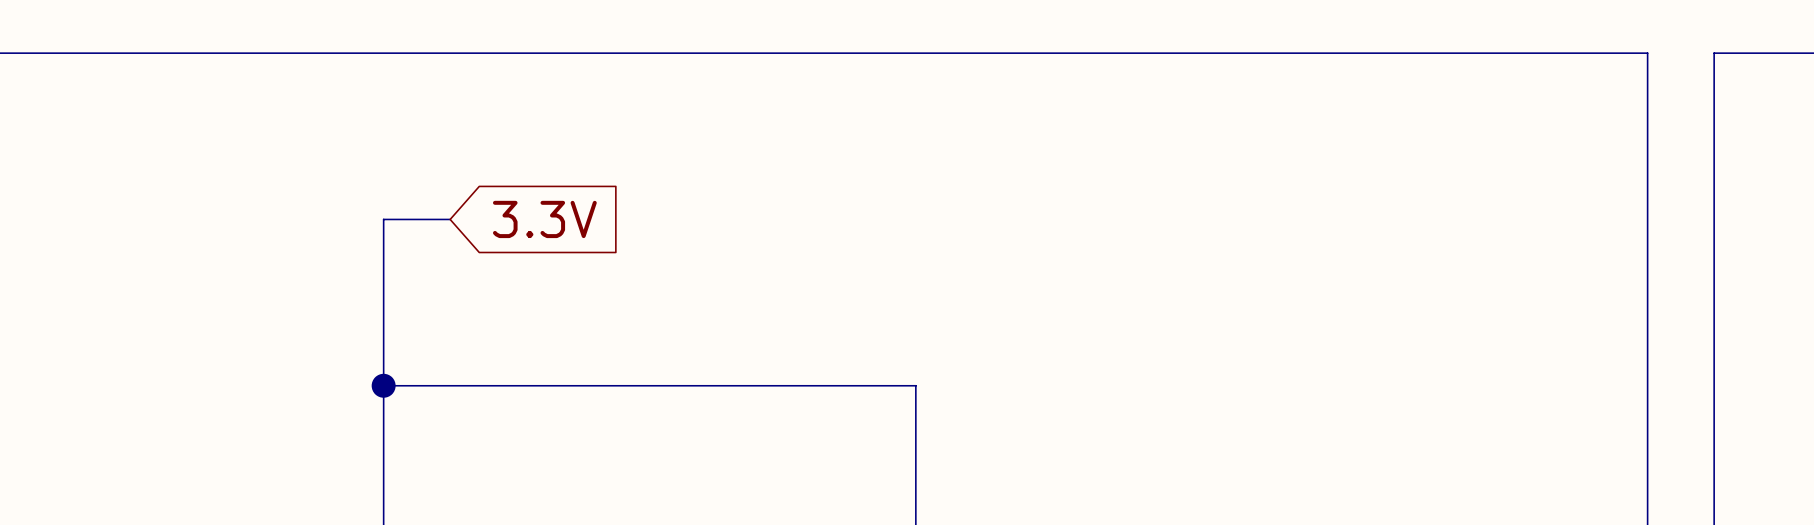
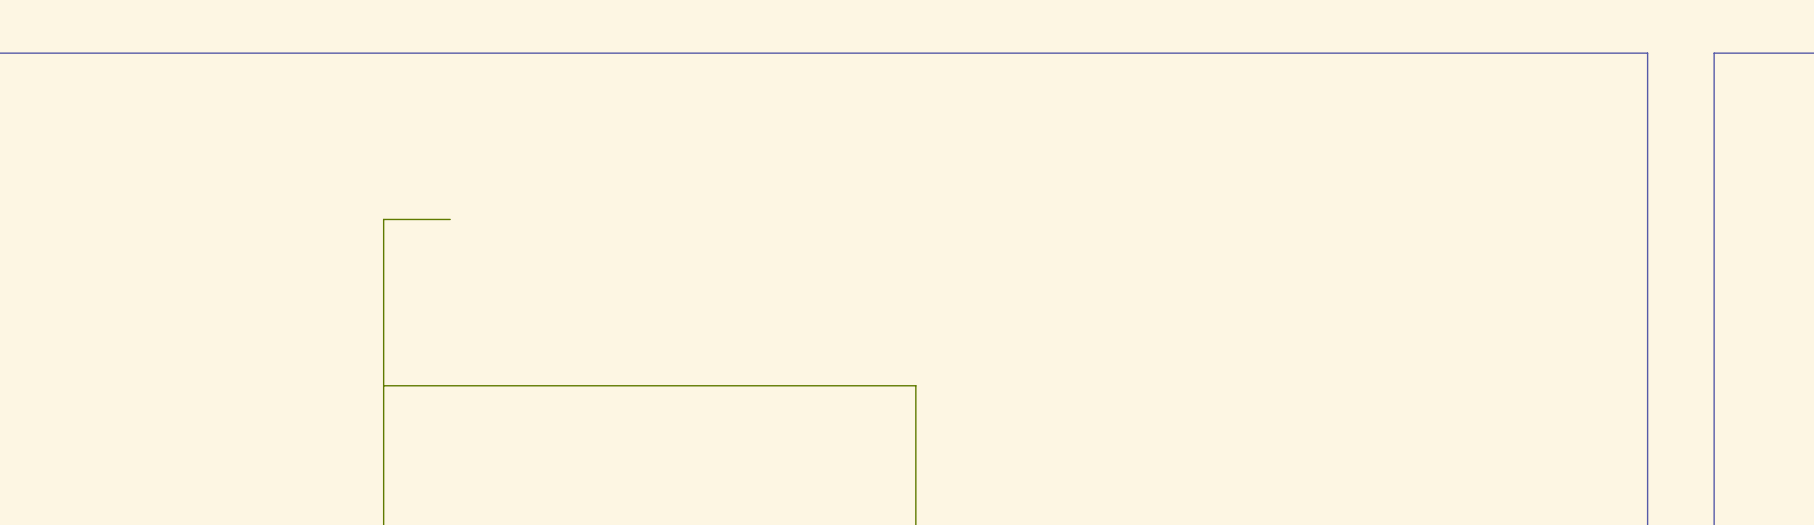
global label: 3.3V (544, 219) -> none
junction: (383, 385) -> none

